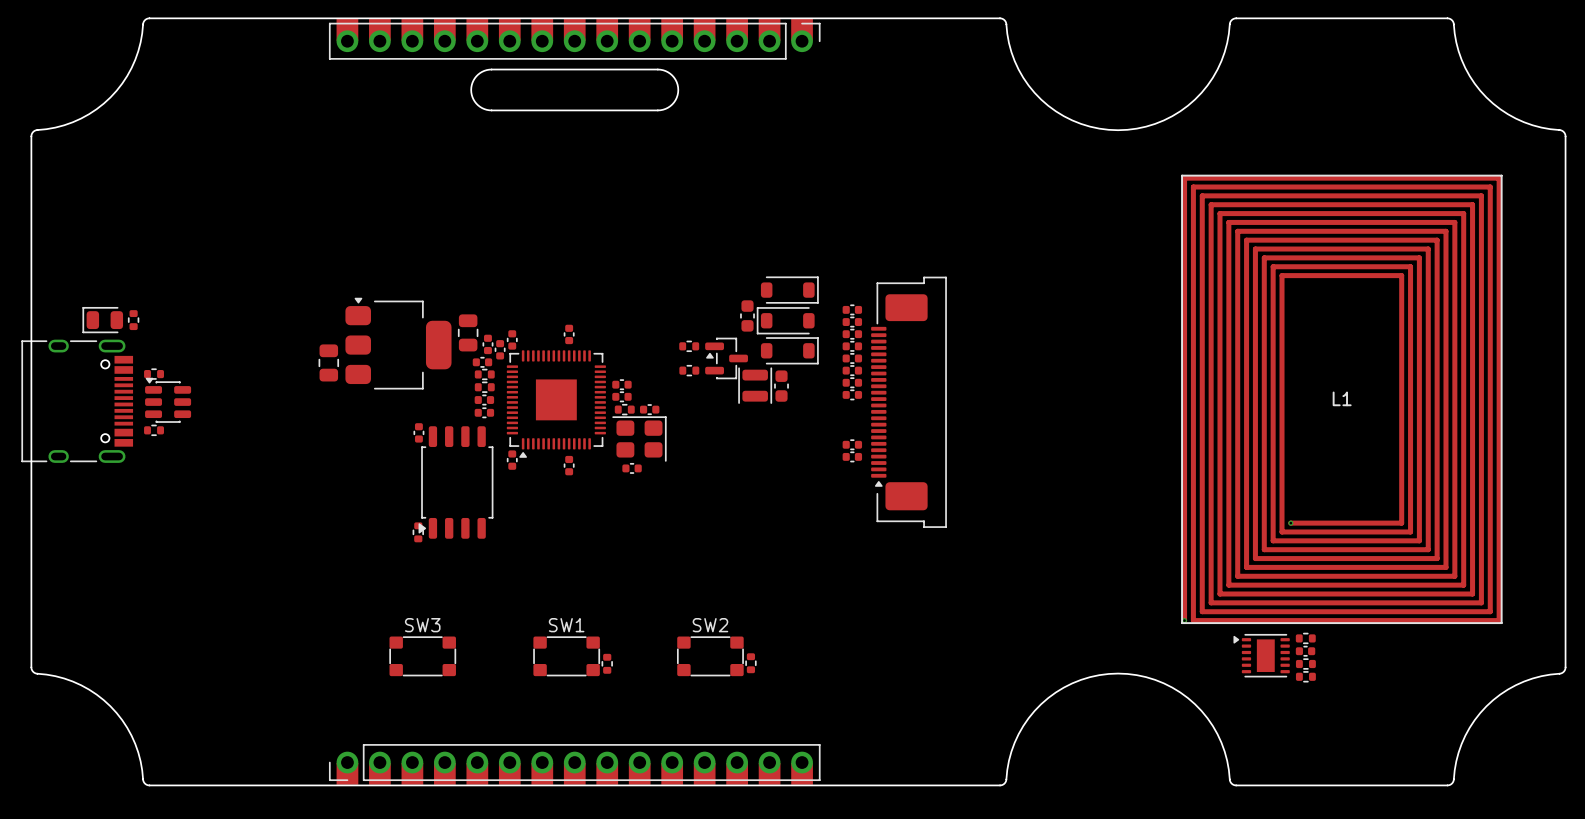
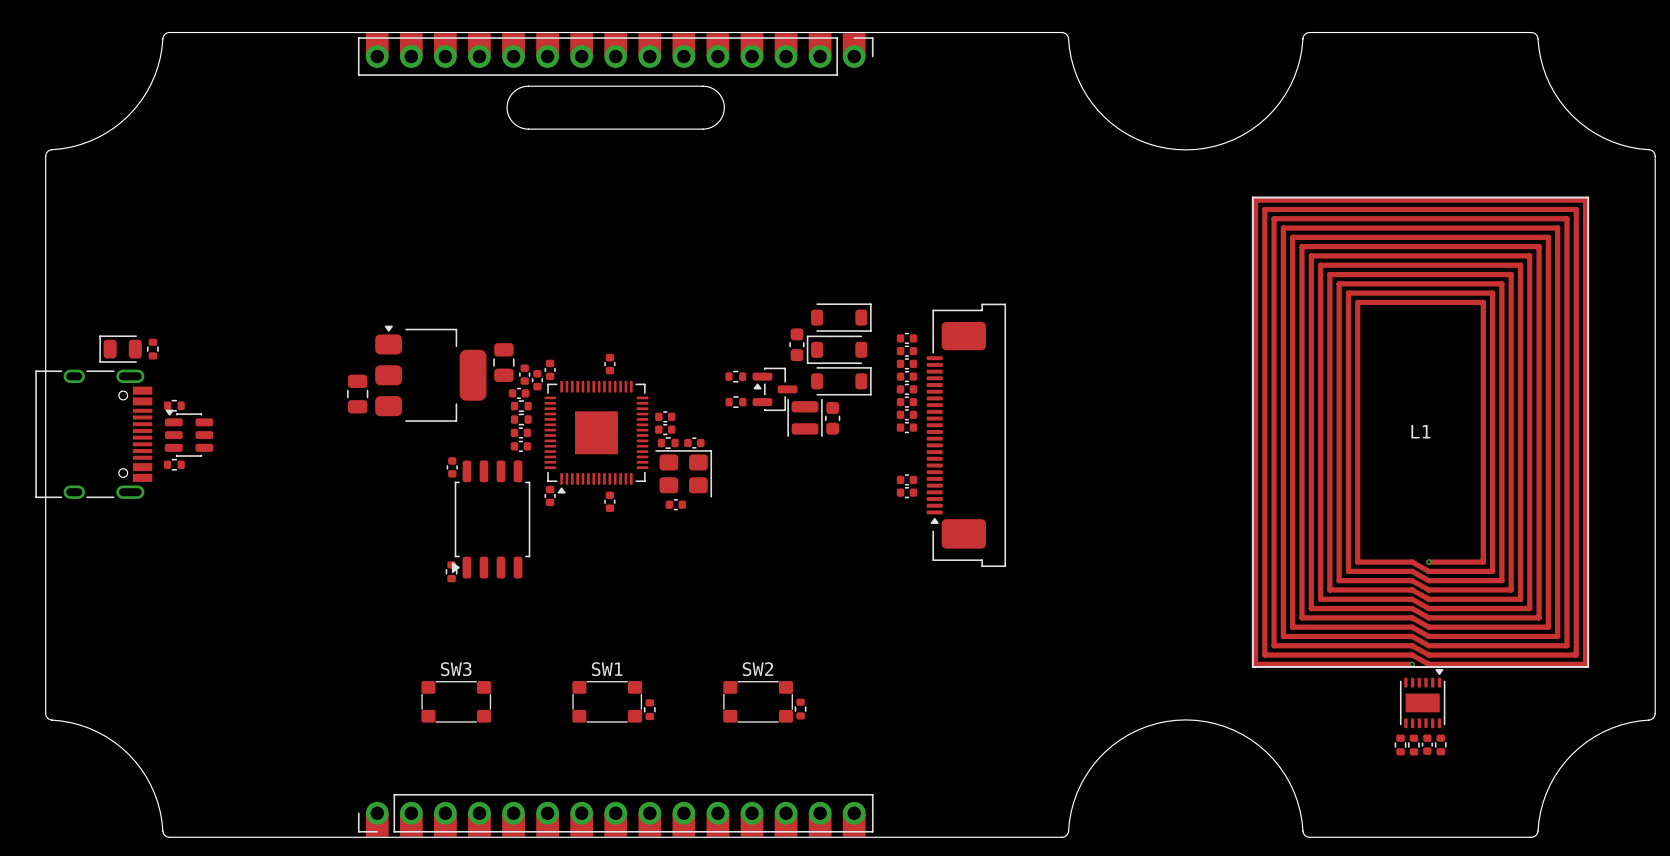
L1 footprint: [1181, 174, 1503, 625] -> [1251, 196, 1590, 668]
part: (1305, 638) -> none
part rotation: 0° (1305, 651) -> 90° clockwise (1427, 744)
part position: (1305, 651) -> (1427, 744)
part rotation: 0° (1261, 655) -> 90° clockwise (1422, 698)
part position: (1261, 655) -> (1422, 698)
part: (1305, 664) -> none
part: (1305, 676) -> none
part: none -> (1400, 745)
part: none -> (1413, 745)
part: none -> (1440, 744)

